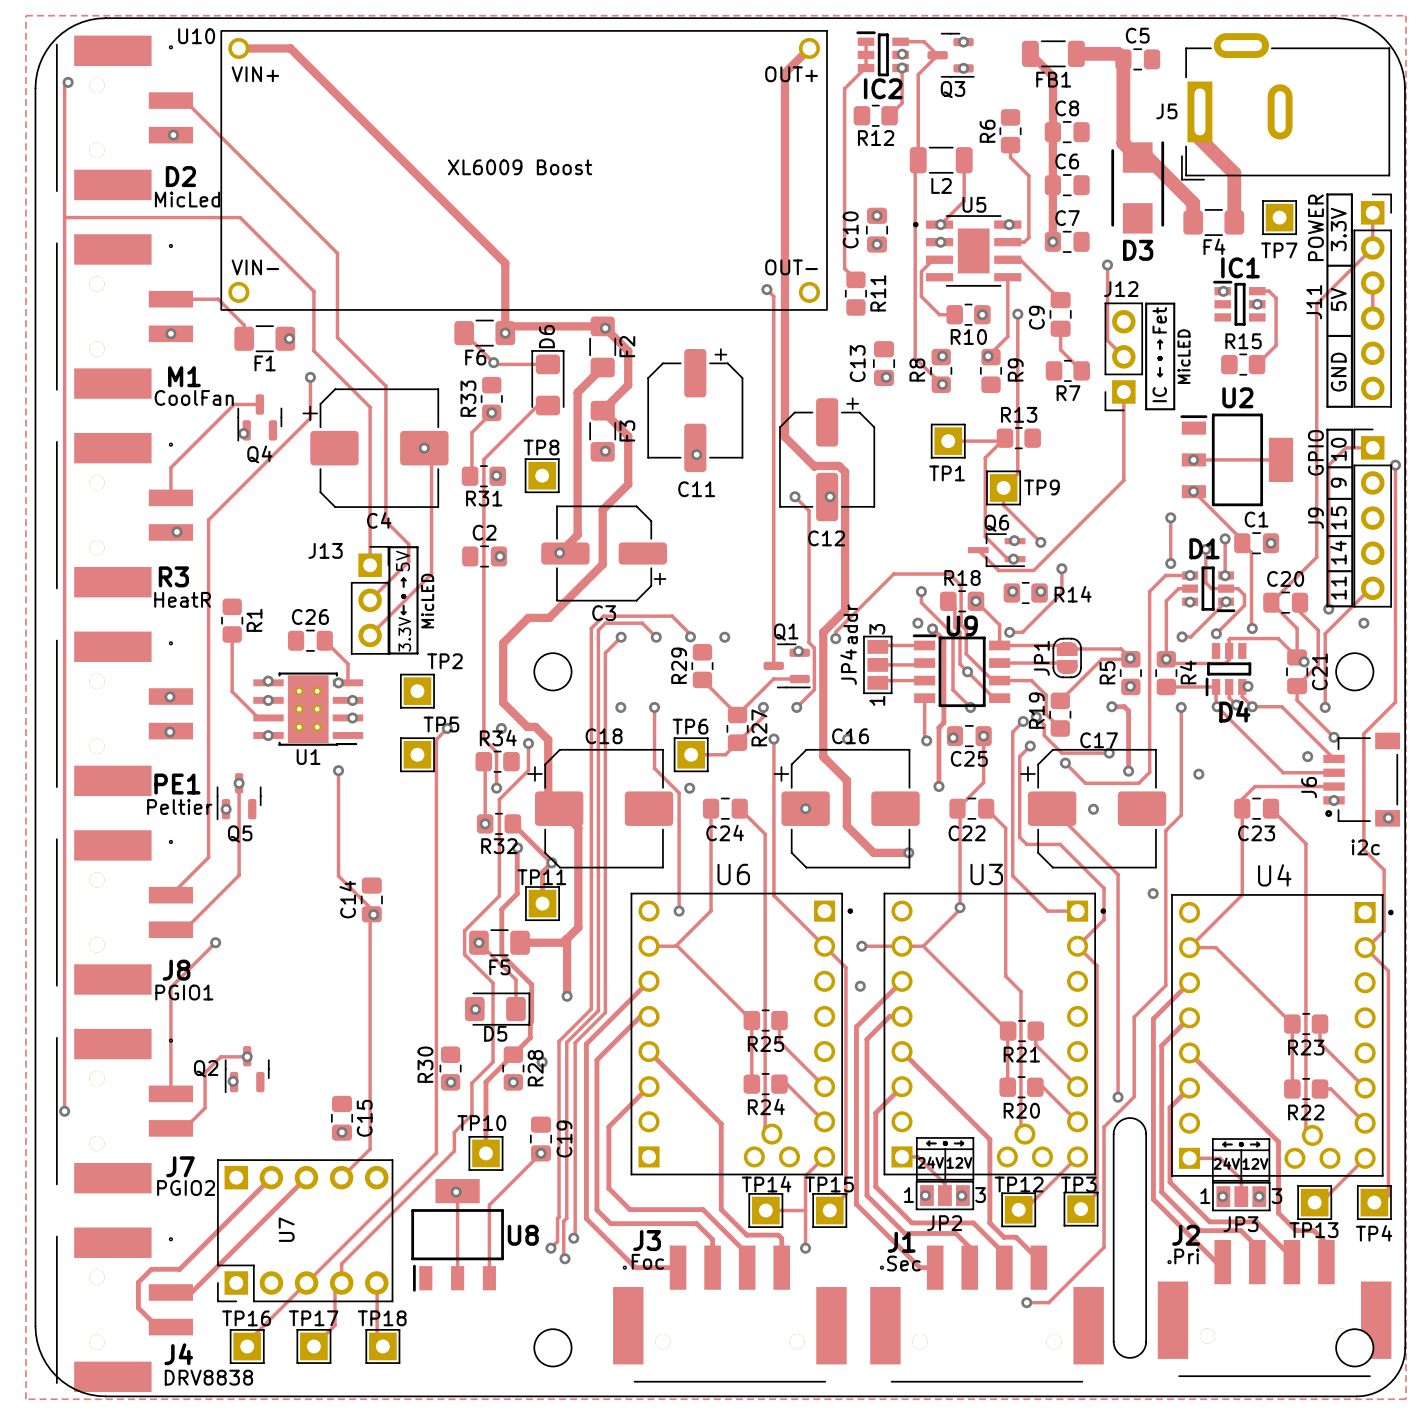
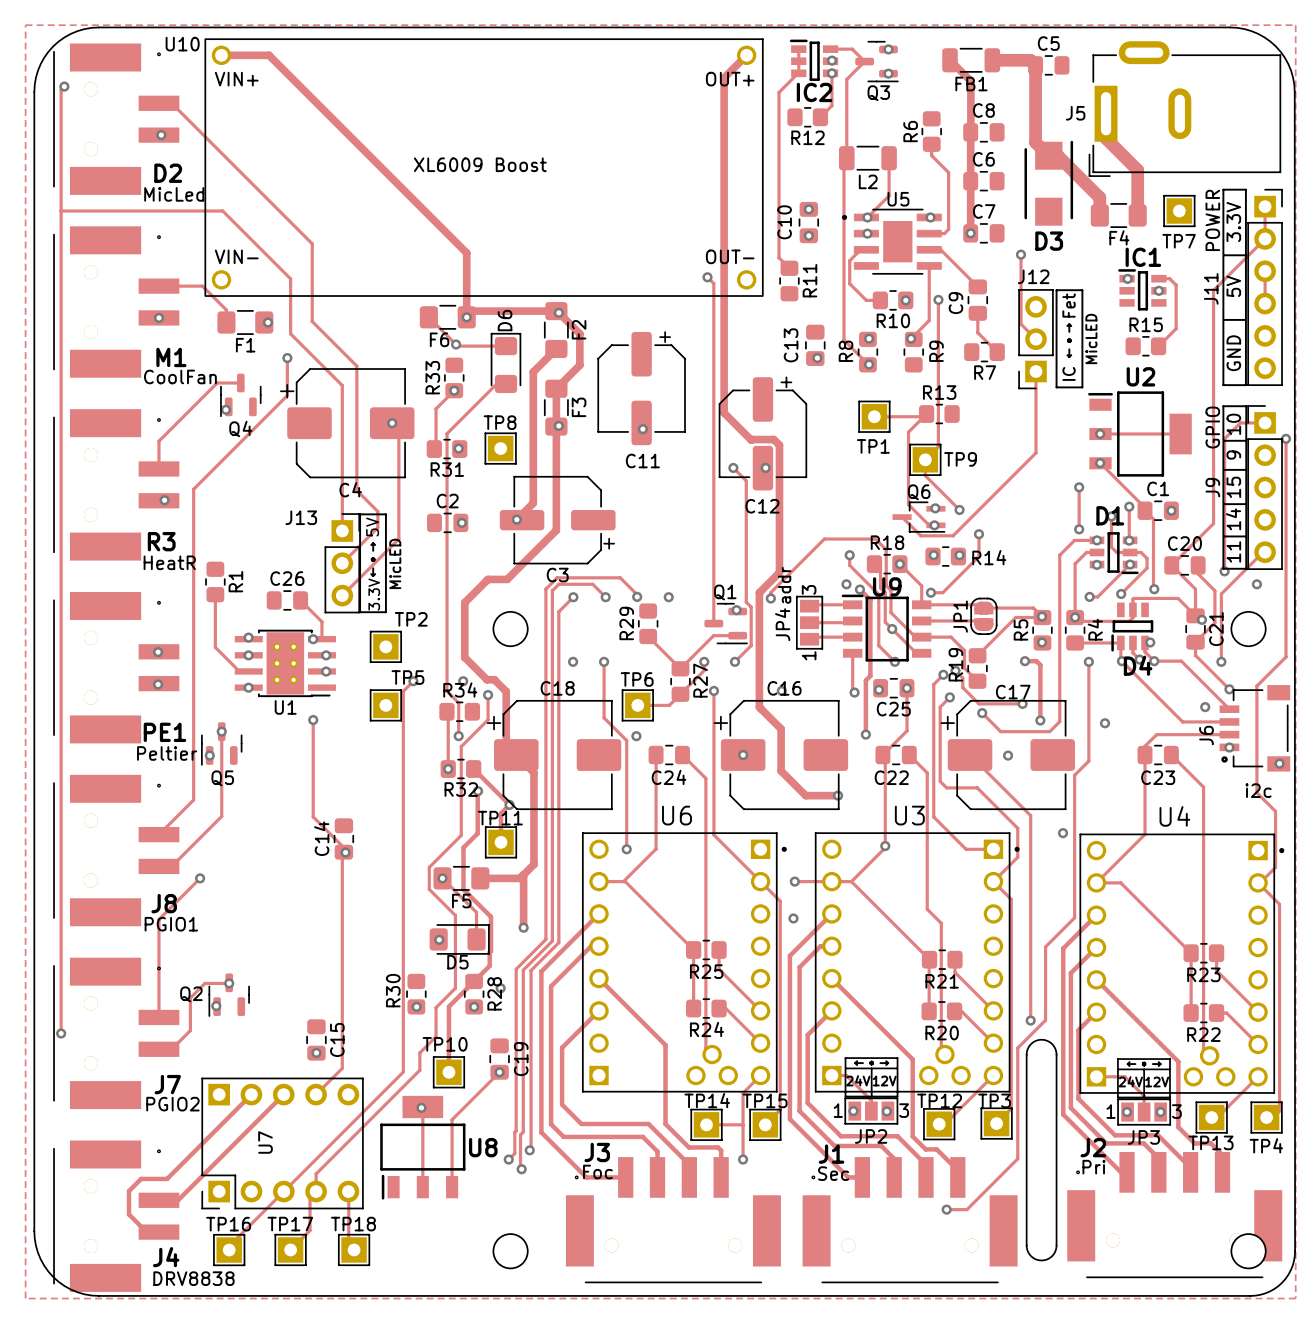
track: (602, 410) (628, 436) (628, 484) (602, 509) -> (556, 388) (556, 480)

